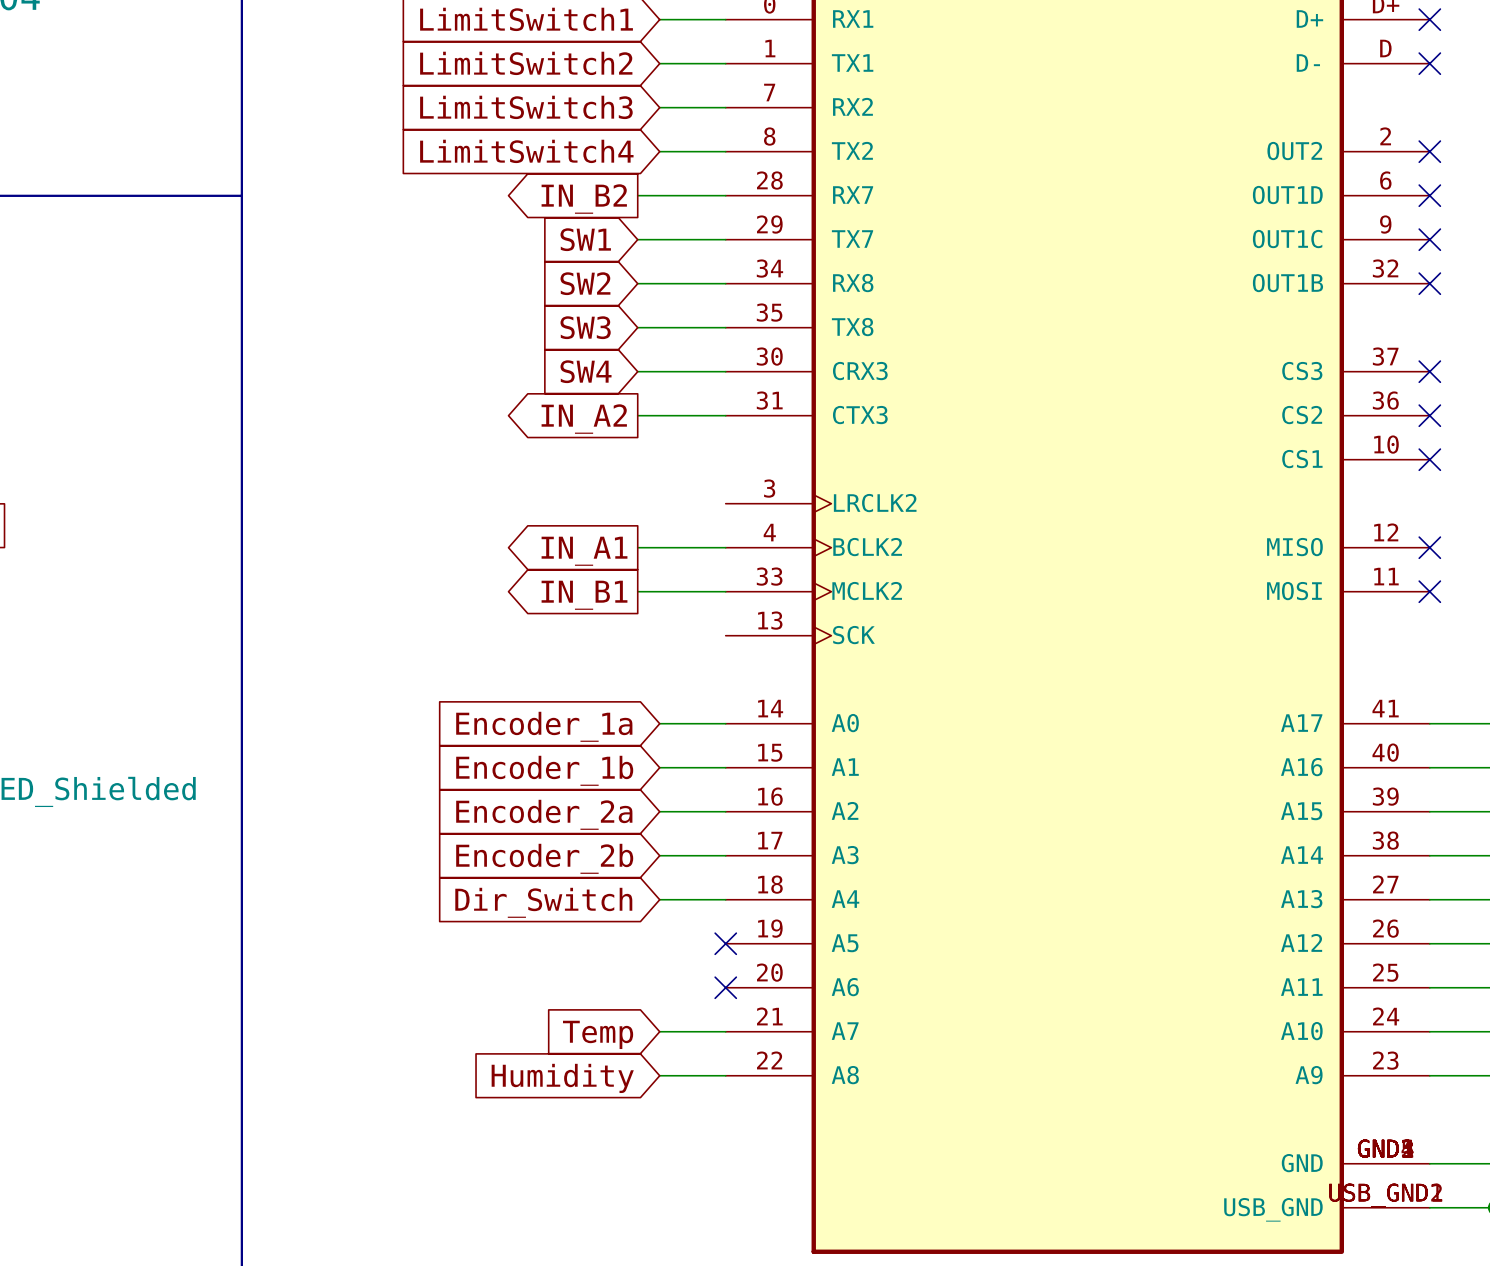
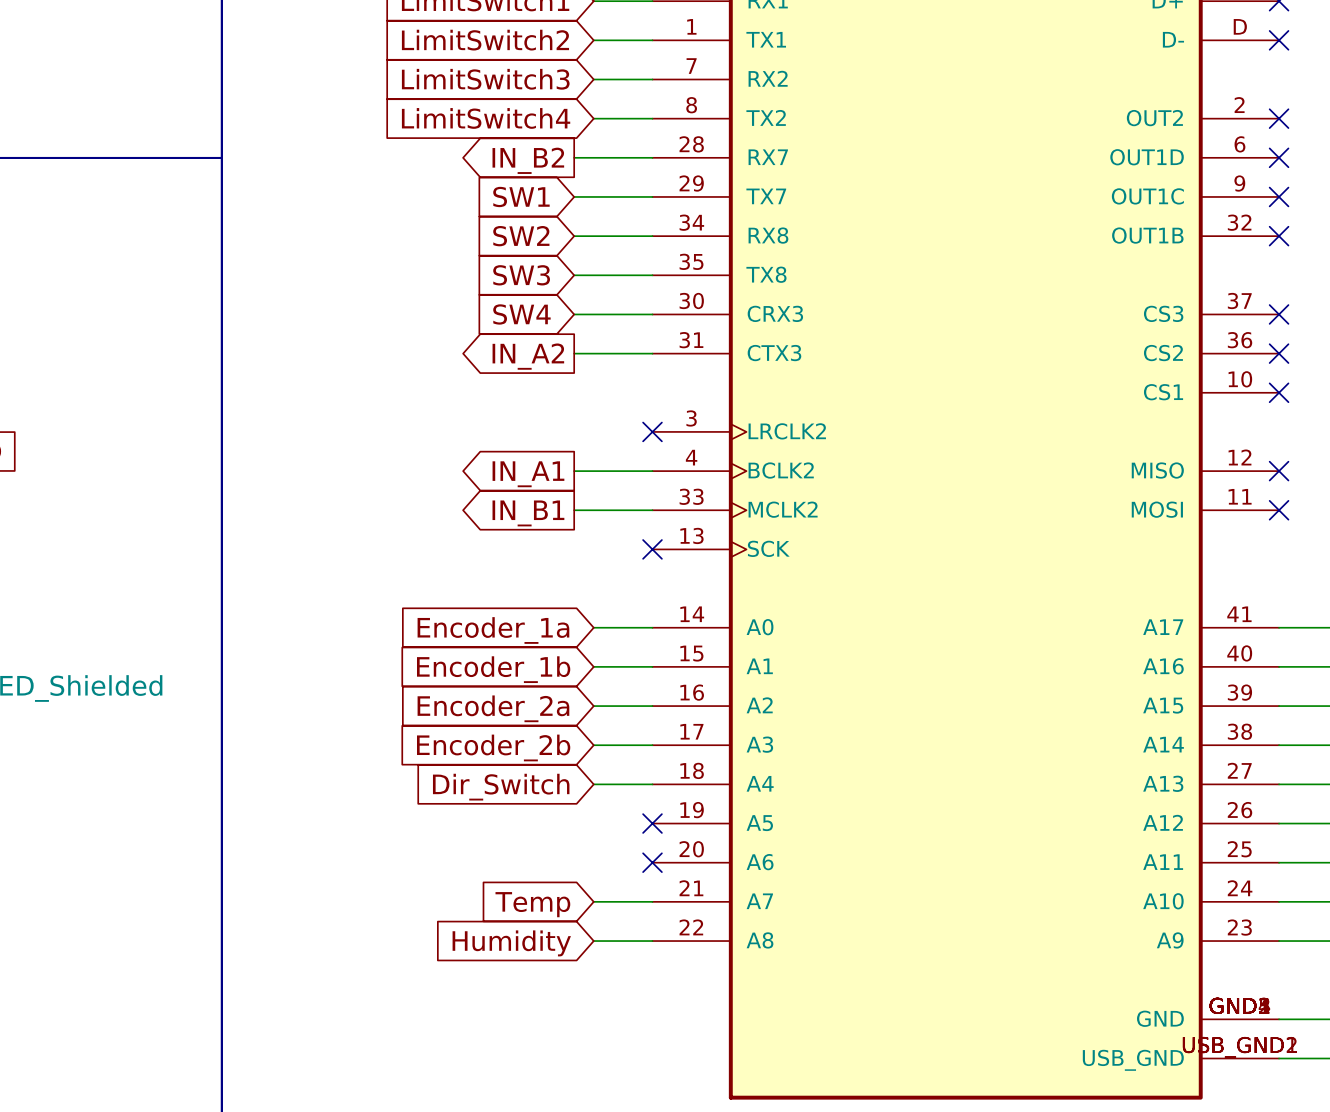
no-connect mark: none -> (652, 431)
no-connect mark: none -> (652, 549)

